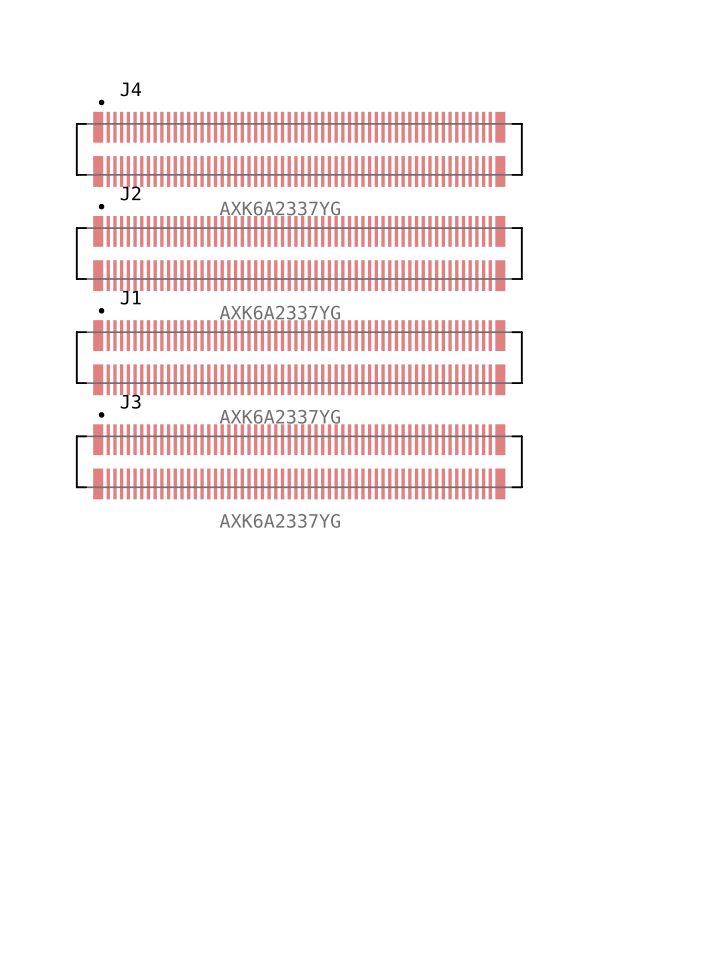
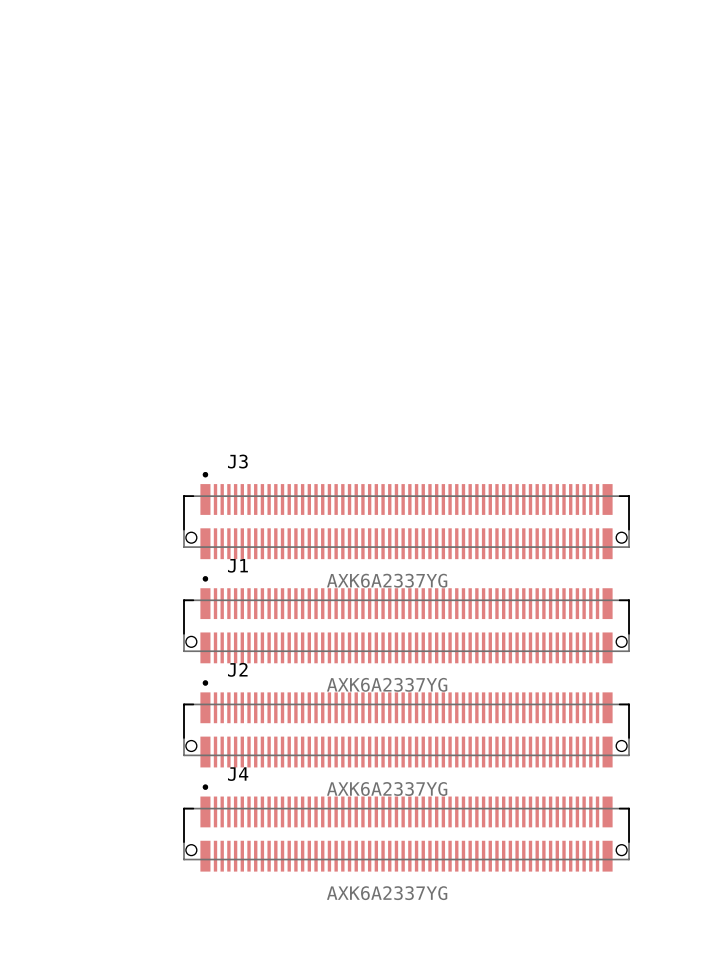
J4 footprint: [75, 99, 523, 187] -> [183, 784, 630, 872]
J2 footprint: [75, 203, 523, 292] -> [183, 680, 630, 768]
J1 footprint: [75, 308, 523, 396] -> [183, 576, 630, 664]
J3 footprint: [75, 412, 523, 500] -> [183, 472, 630, 560]

